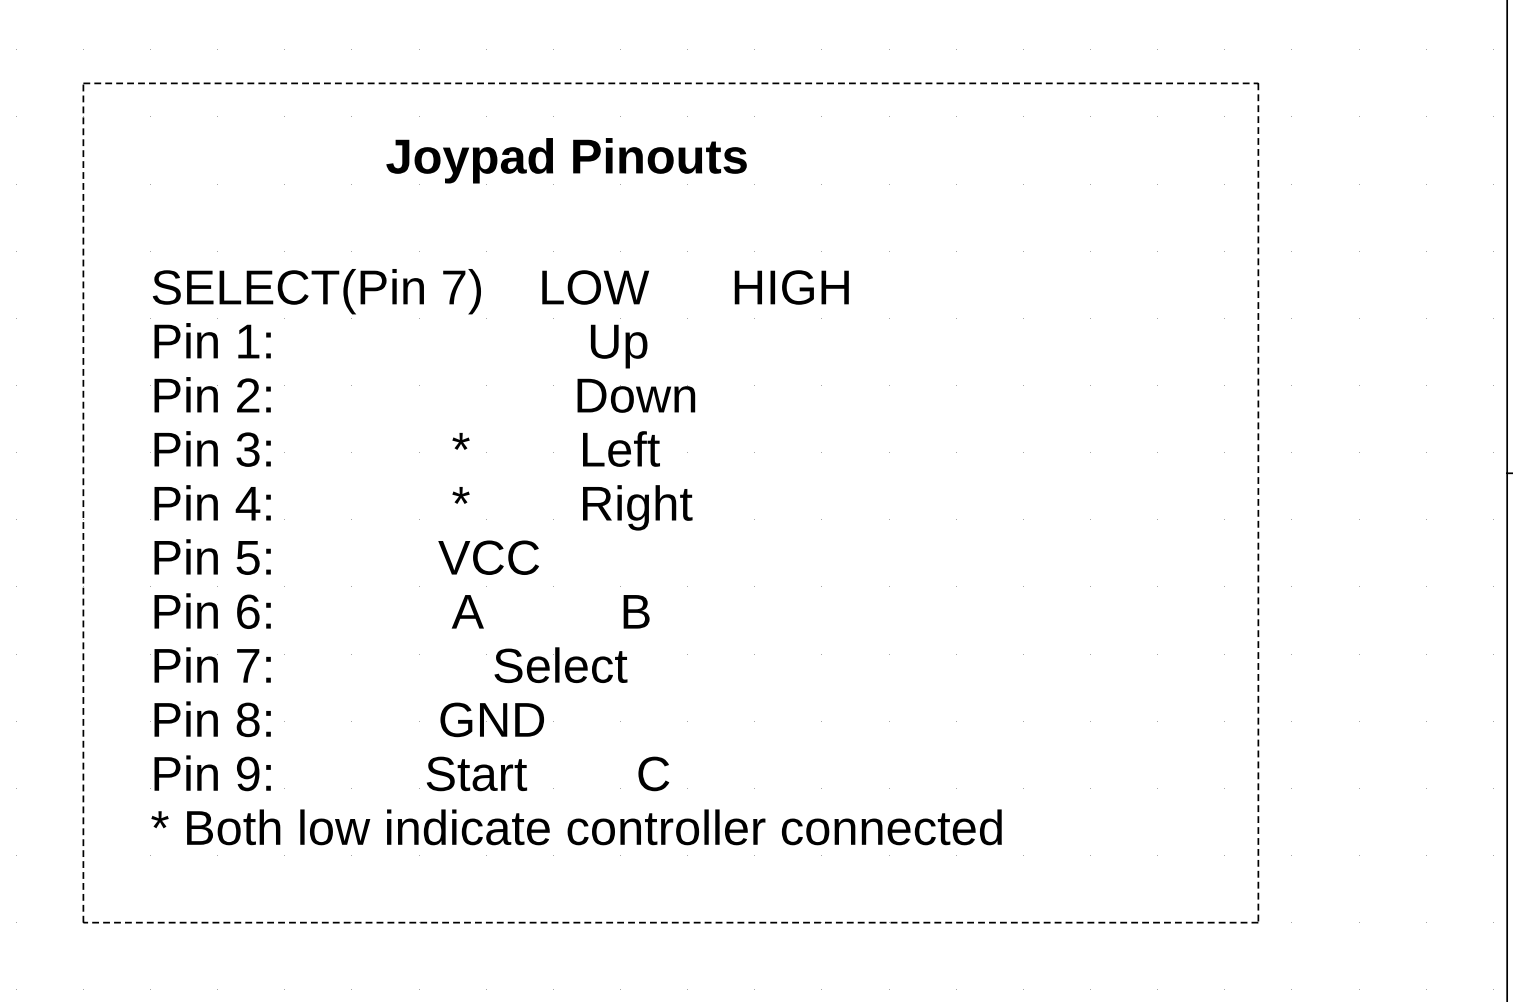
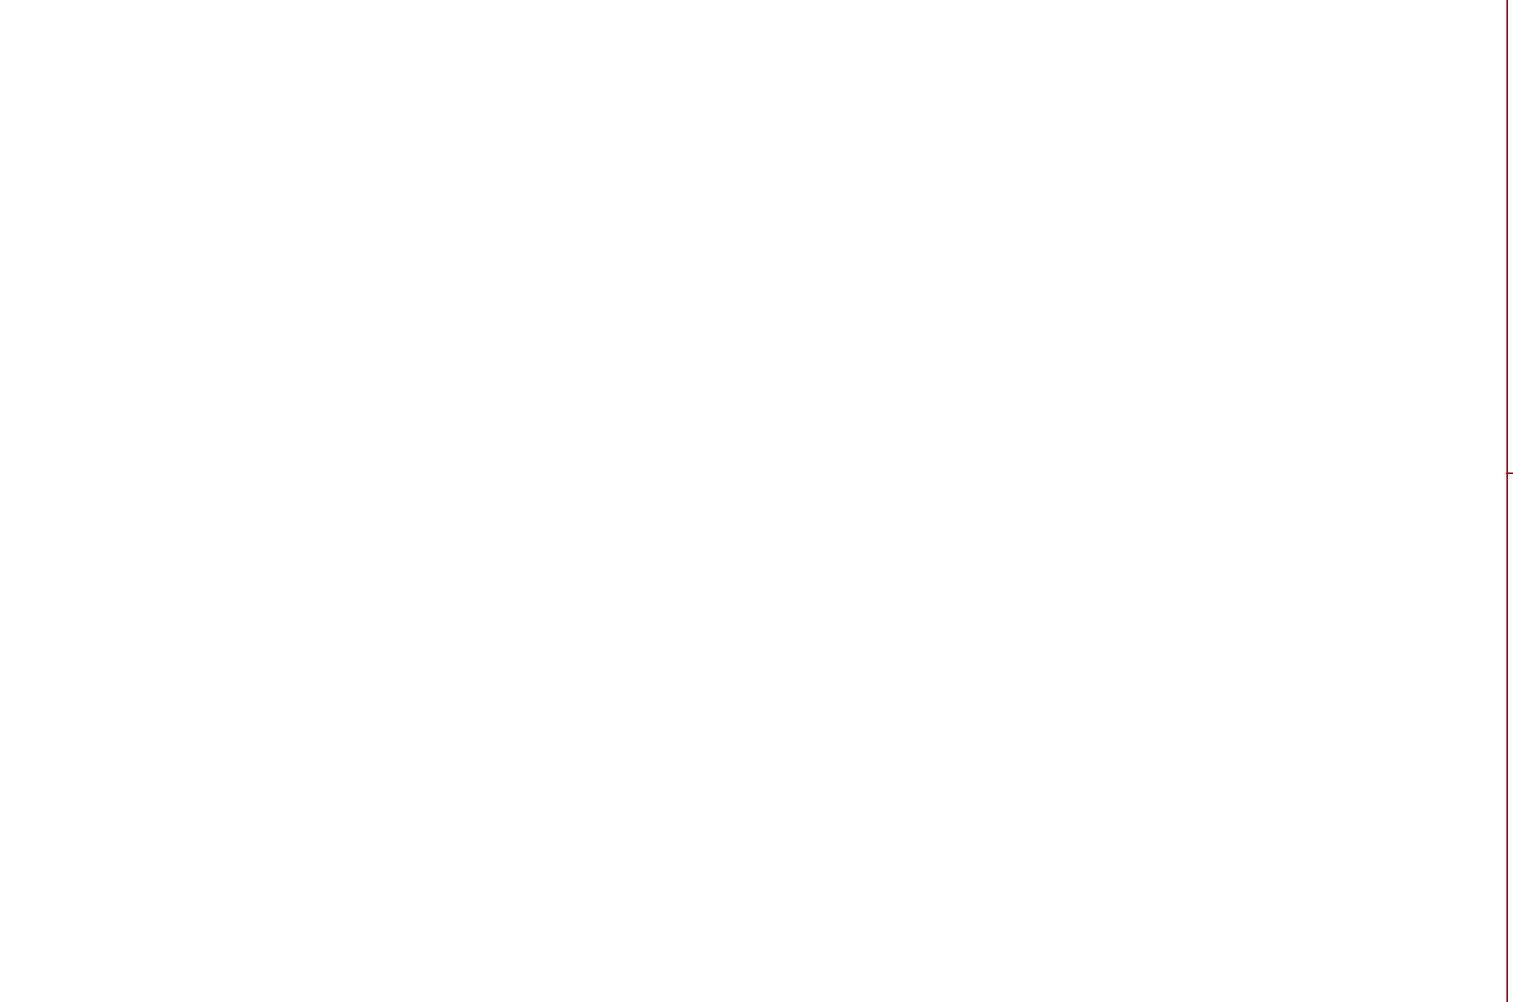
line: (83, 83) (83, 922) (1258, 922) (1258, 83) (83, 83) -> none
text: Joypad Pinouts (566, 160) -> none
text: SELECT(Pin 7) LOW HIGH (500, 291) -> none
text: Pin 1: Up (400, 345) -> none
text: Pin 2: Down (424, 394) -> none
text: Pin 3: * Left (407, 449) -> none
text: Pin 4: * Right (423, 507) -> none
text: Pin 5: VCC (346, 557) -> none
text: Pin 6: A B (402, 611) -> none
text: Pin 7: Select (391, 665) -> none
text: Pin 8: GND (349, 719) -> none
text: Pin 9: Start C (411, 773) -> none
text: * Both low indicate controller connected (576, 827) -> none

